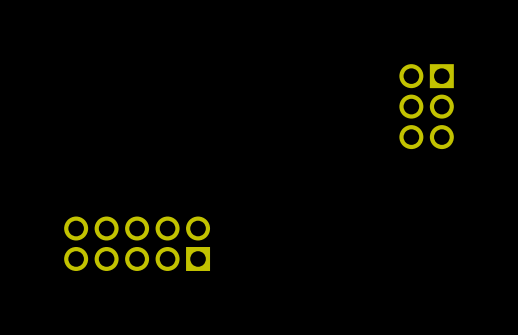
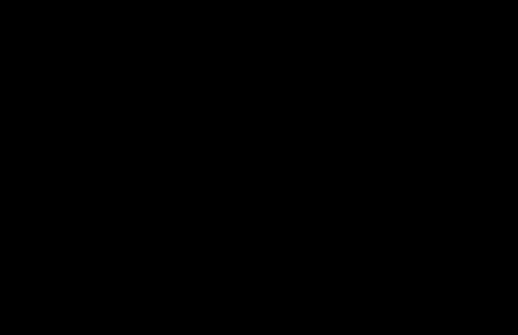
part: (426, 106) -> none
part: (137, 243) -> none

